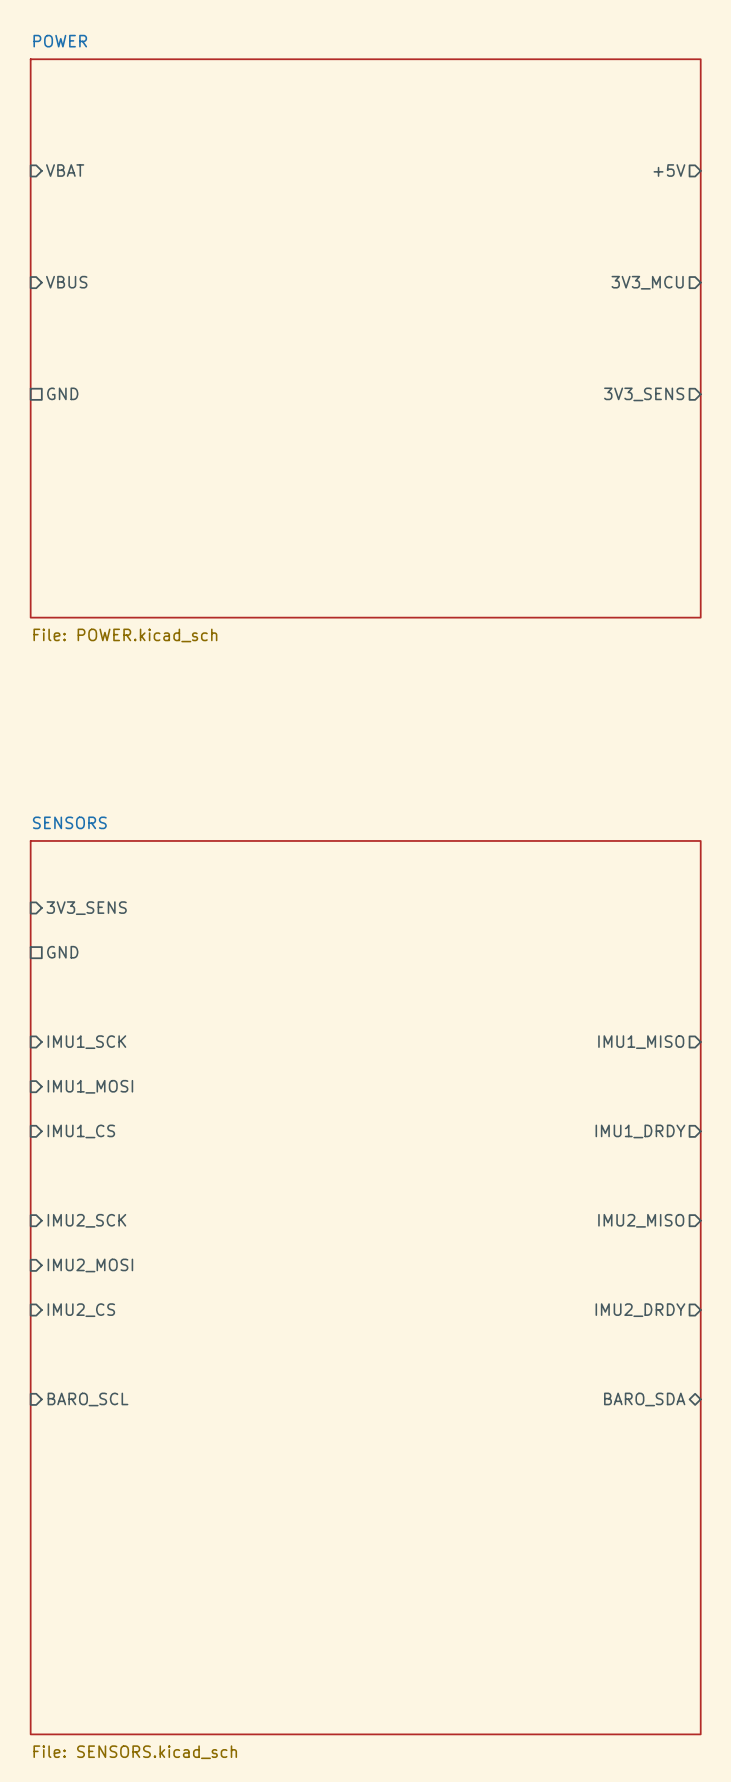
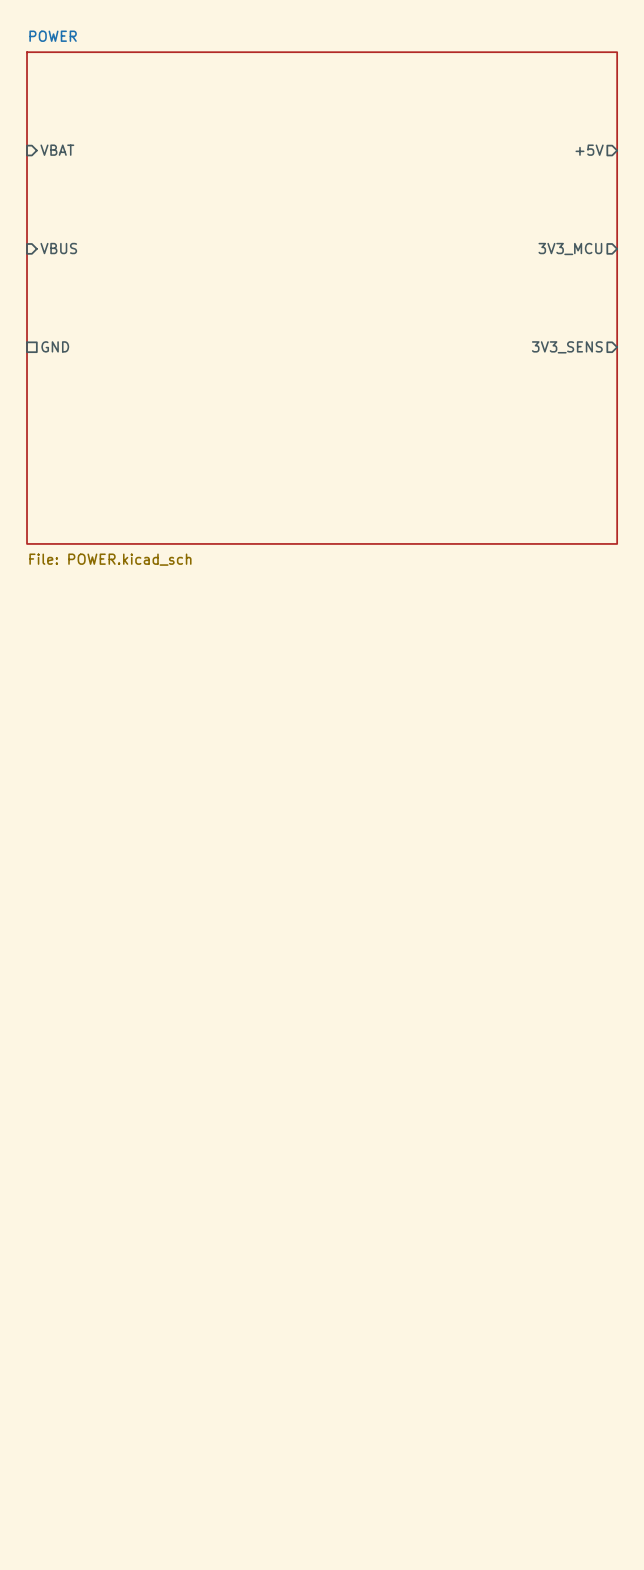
sheet pin: 3V3_SENS (86, 908) -> none
sheet pin: GND (62, 952) -> none
sheet pin: IMU1_SCK (86, 1042) -> none
sheet pin: IMU1_MISO (641, 1042) -> none
sheet pin: IMU1_MOSI (90, 1086) -> none
sheet pin: IMU1_CS (81, 1131) -> none
sheet pin: IMU1_DRDY (640, 1131) -> none
sheet pin: IMU2_SCK (86, 1220) -> none
sheet pin: IMU2_MISO (641, 1220) -> none
sheet pin: IMU2_MOSI (90, 1265) -> none
sheet SENSORS: File: SENSORS.kicad_sch (365, 1287) -> none
sheet pin: IMU2_CS (81, 1310) -> none
sheet pin: IMU2_DRDY (640, 1310) -> none
sheet pin: BARO_SCL (88, 1399) -> none
sheet pin: BARO_SDA (644, 1399) -> none

